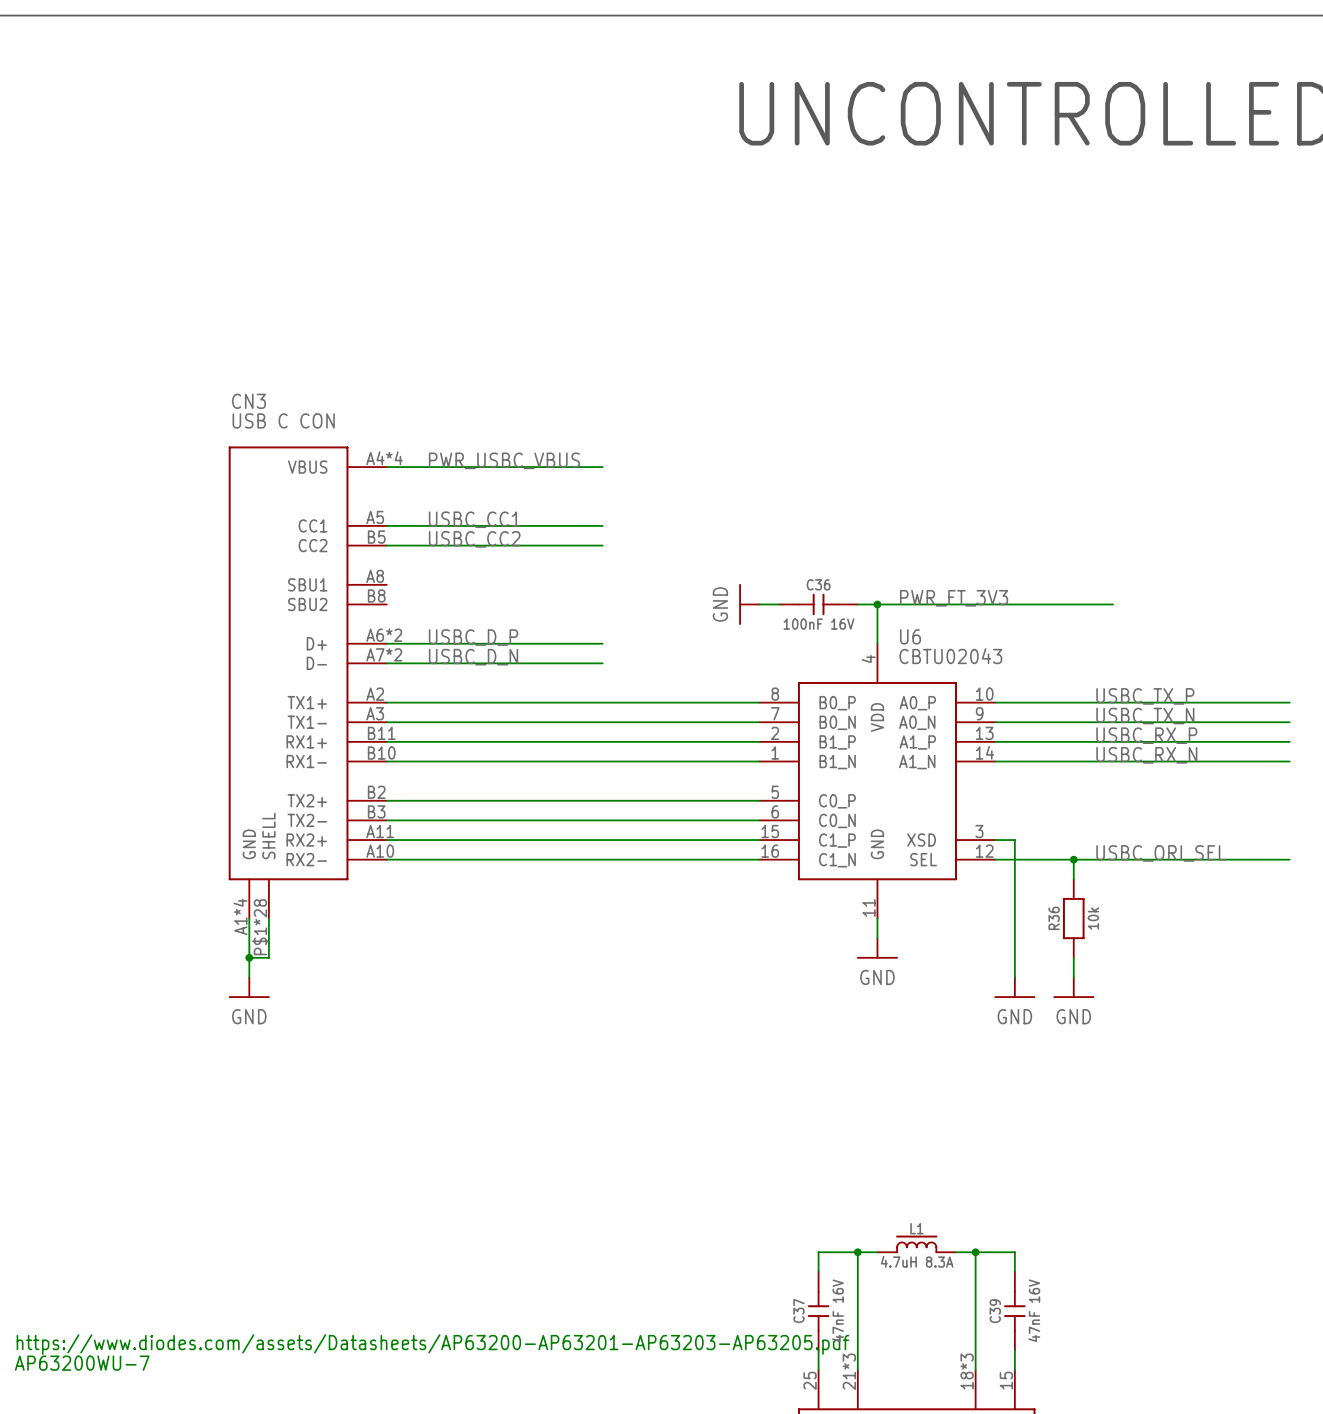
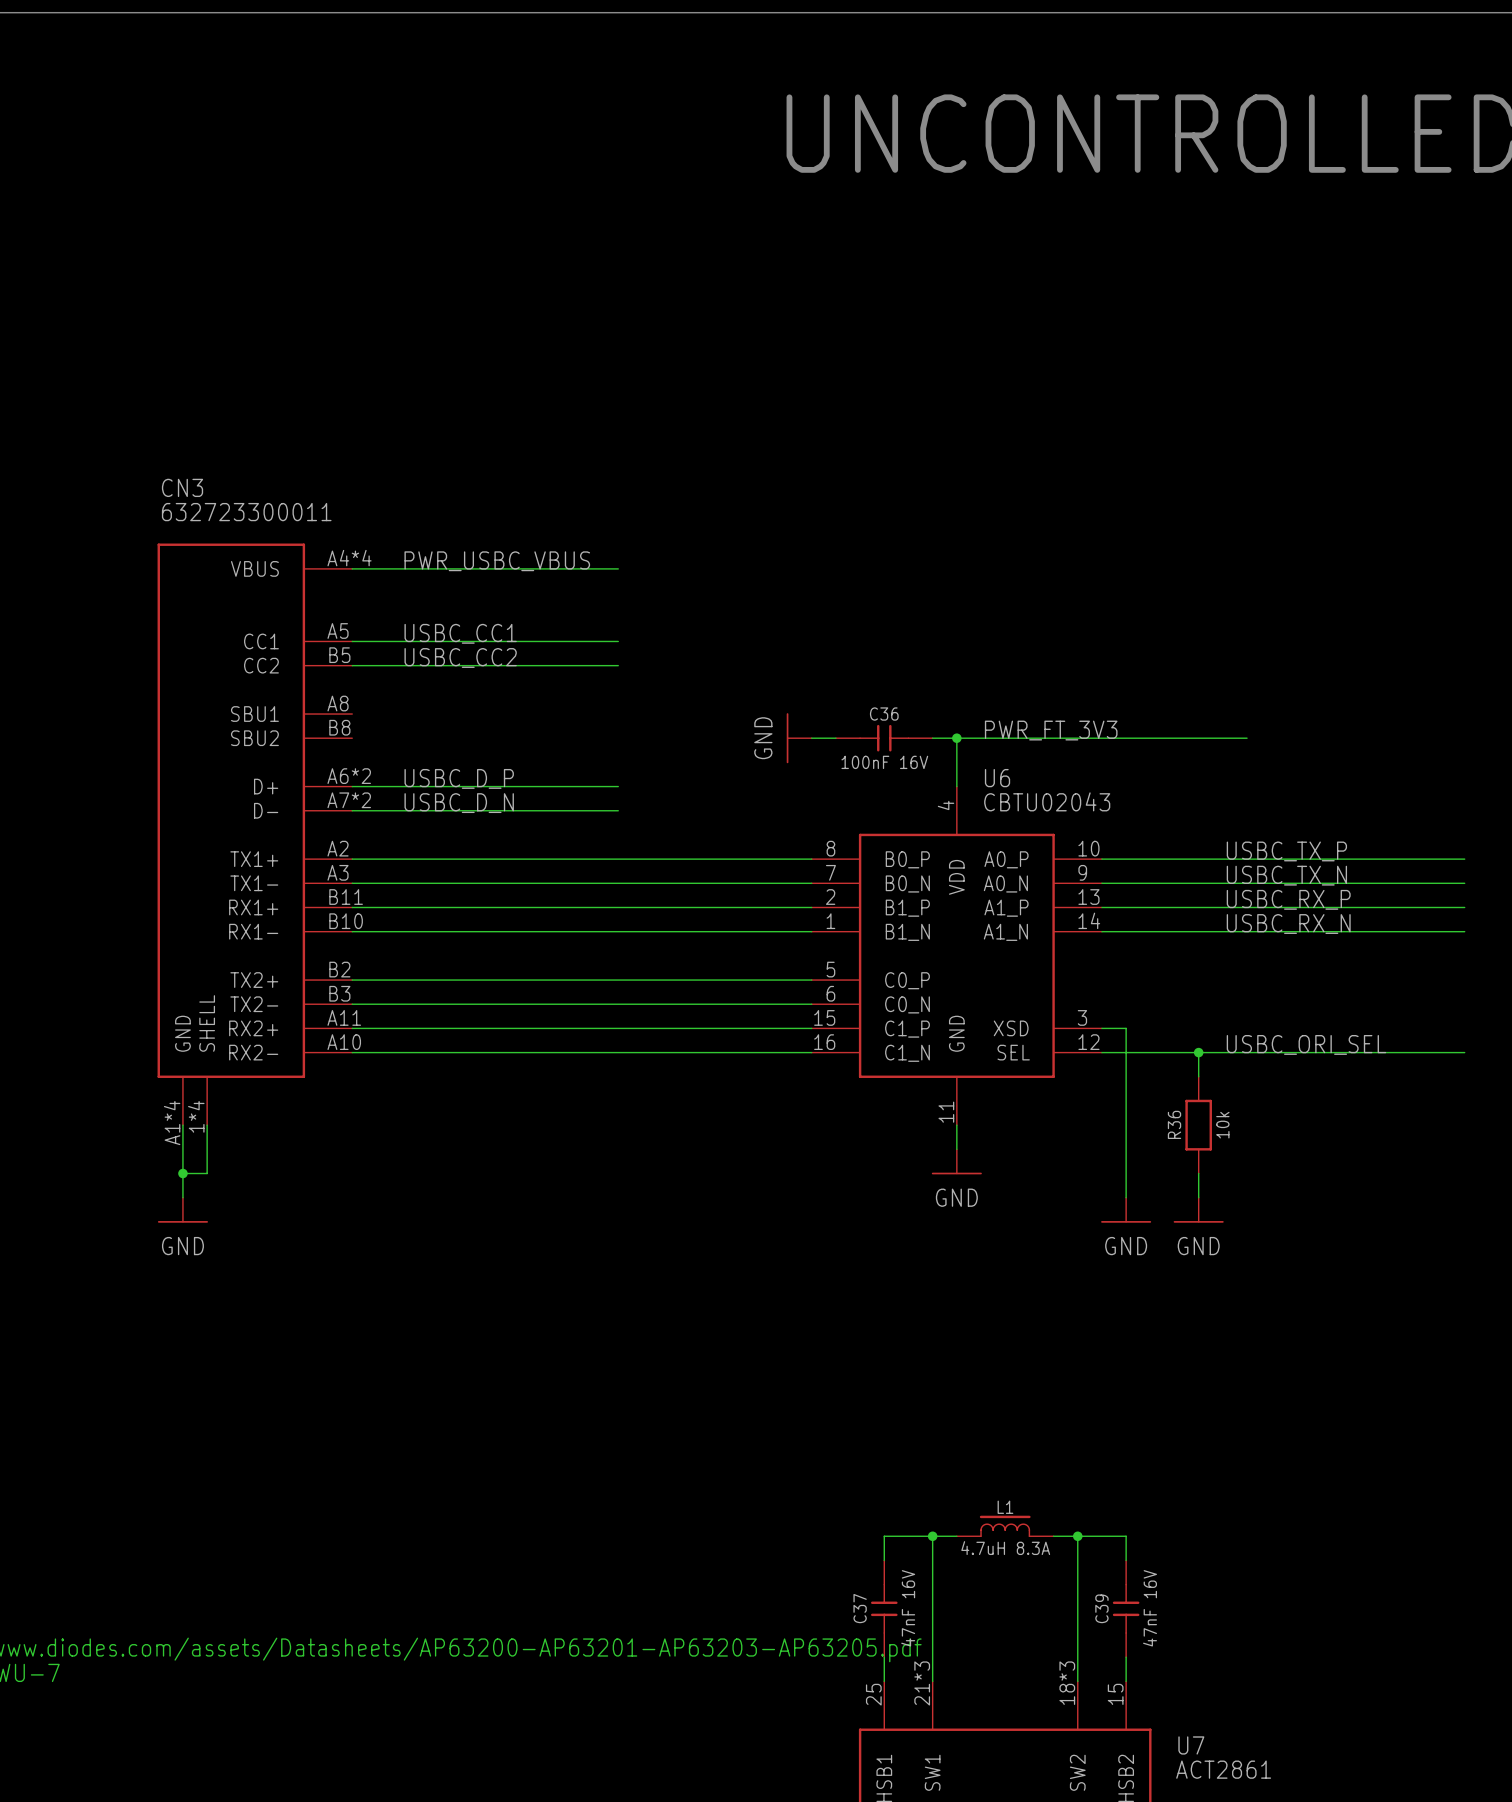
CN3 value: USB C CON (283, 420) -> 632723300011 (246, 512)
CN3 pin number: P$1*28 (260, 927) -> 1*4 (196, 1116)

